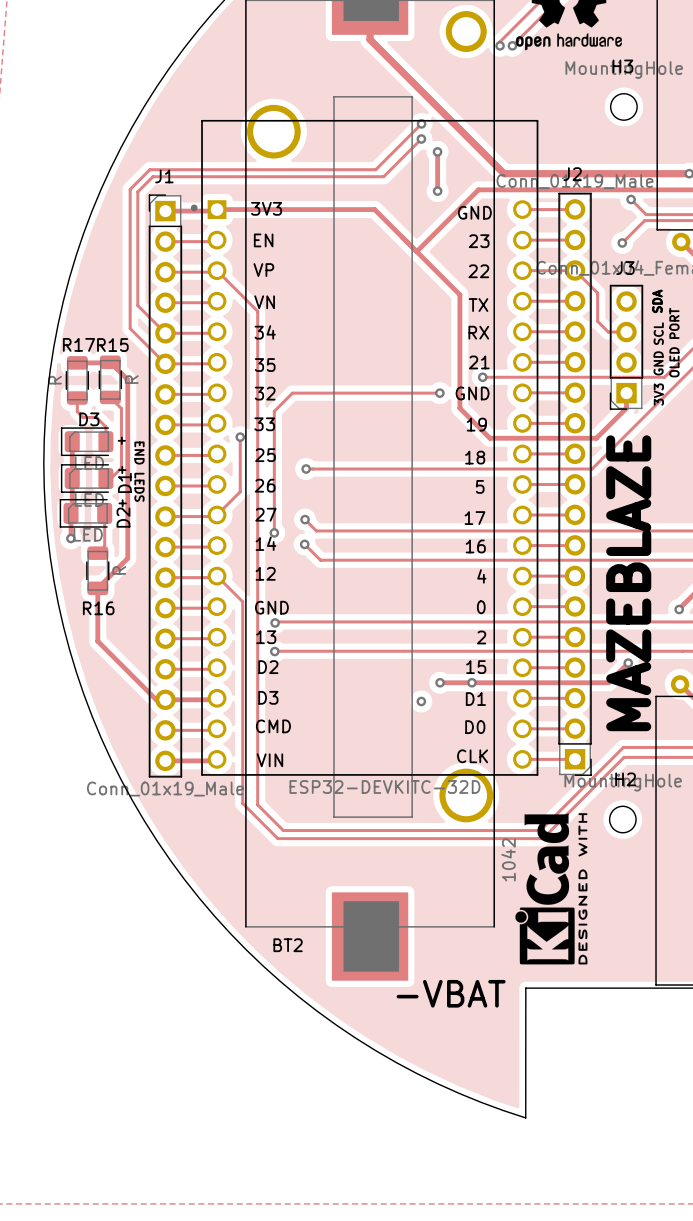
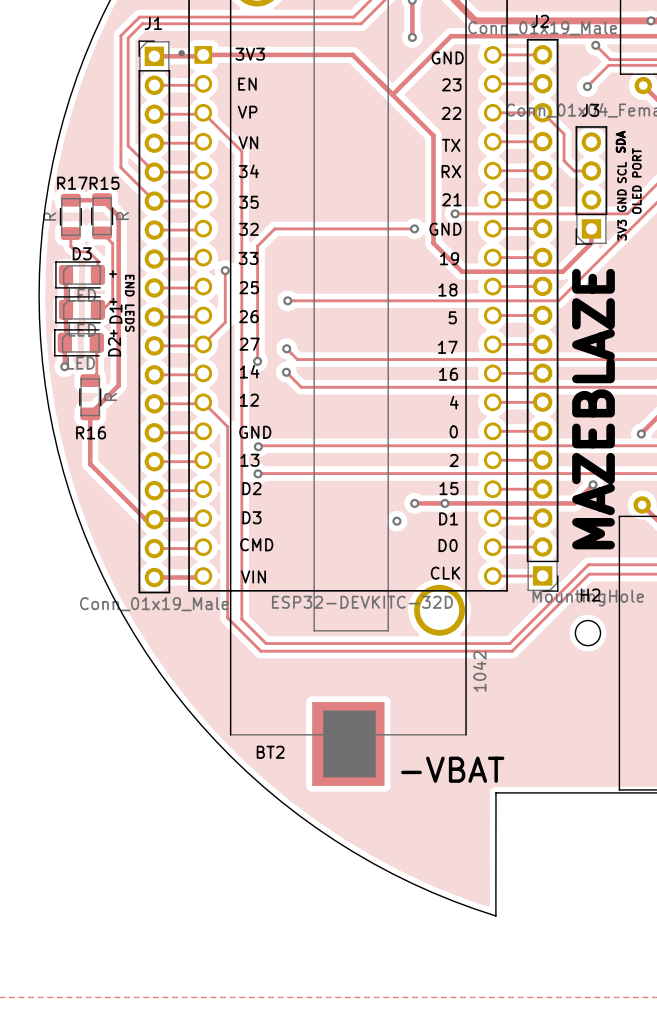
drawing: [515, 813, 588, 965] -> none
text position: -VBAT (451, 993) -> -VBAT (452, 769)

